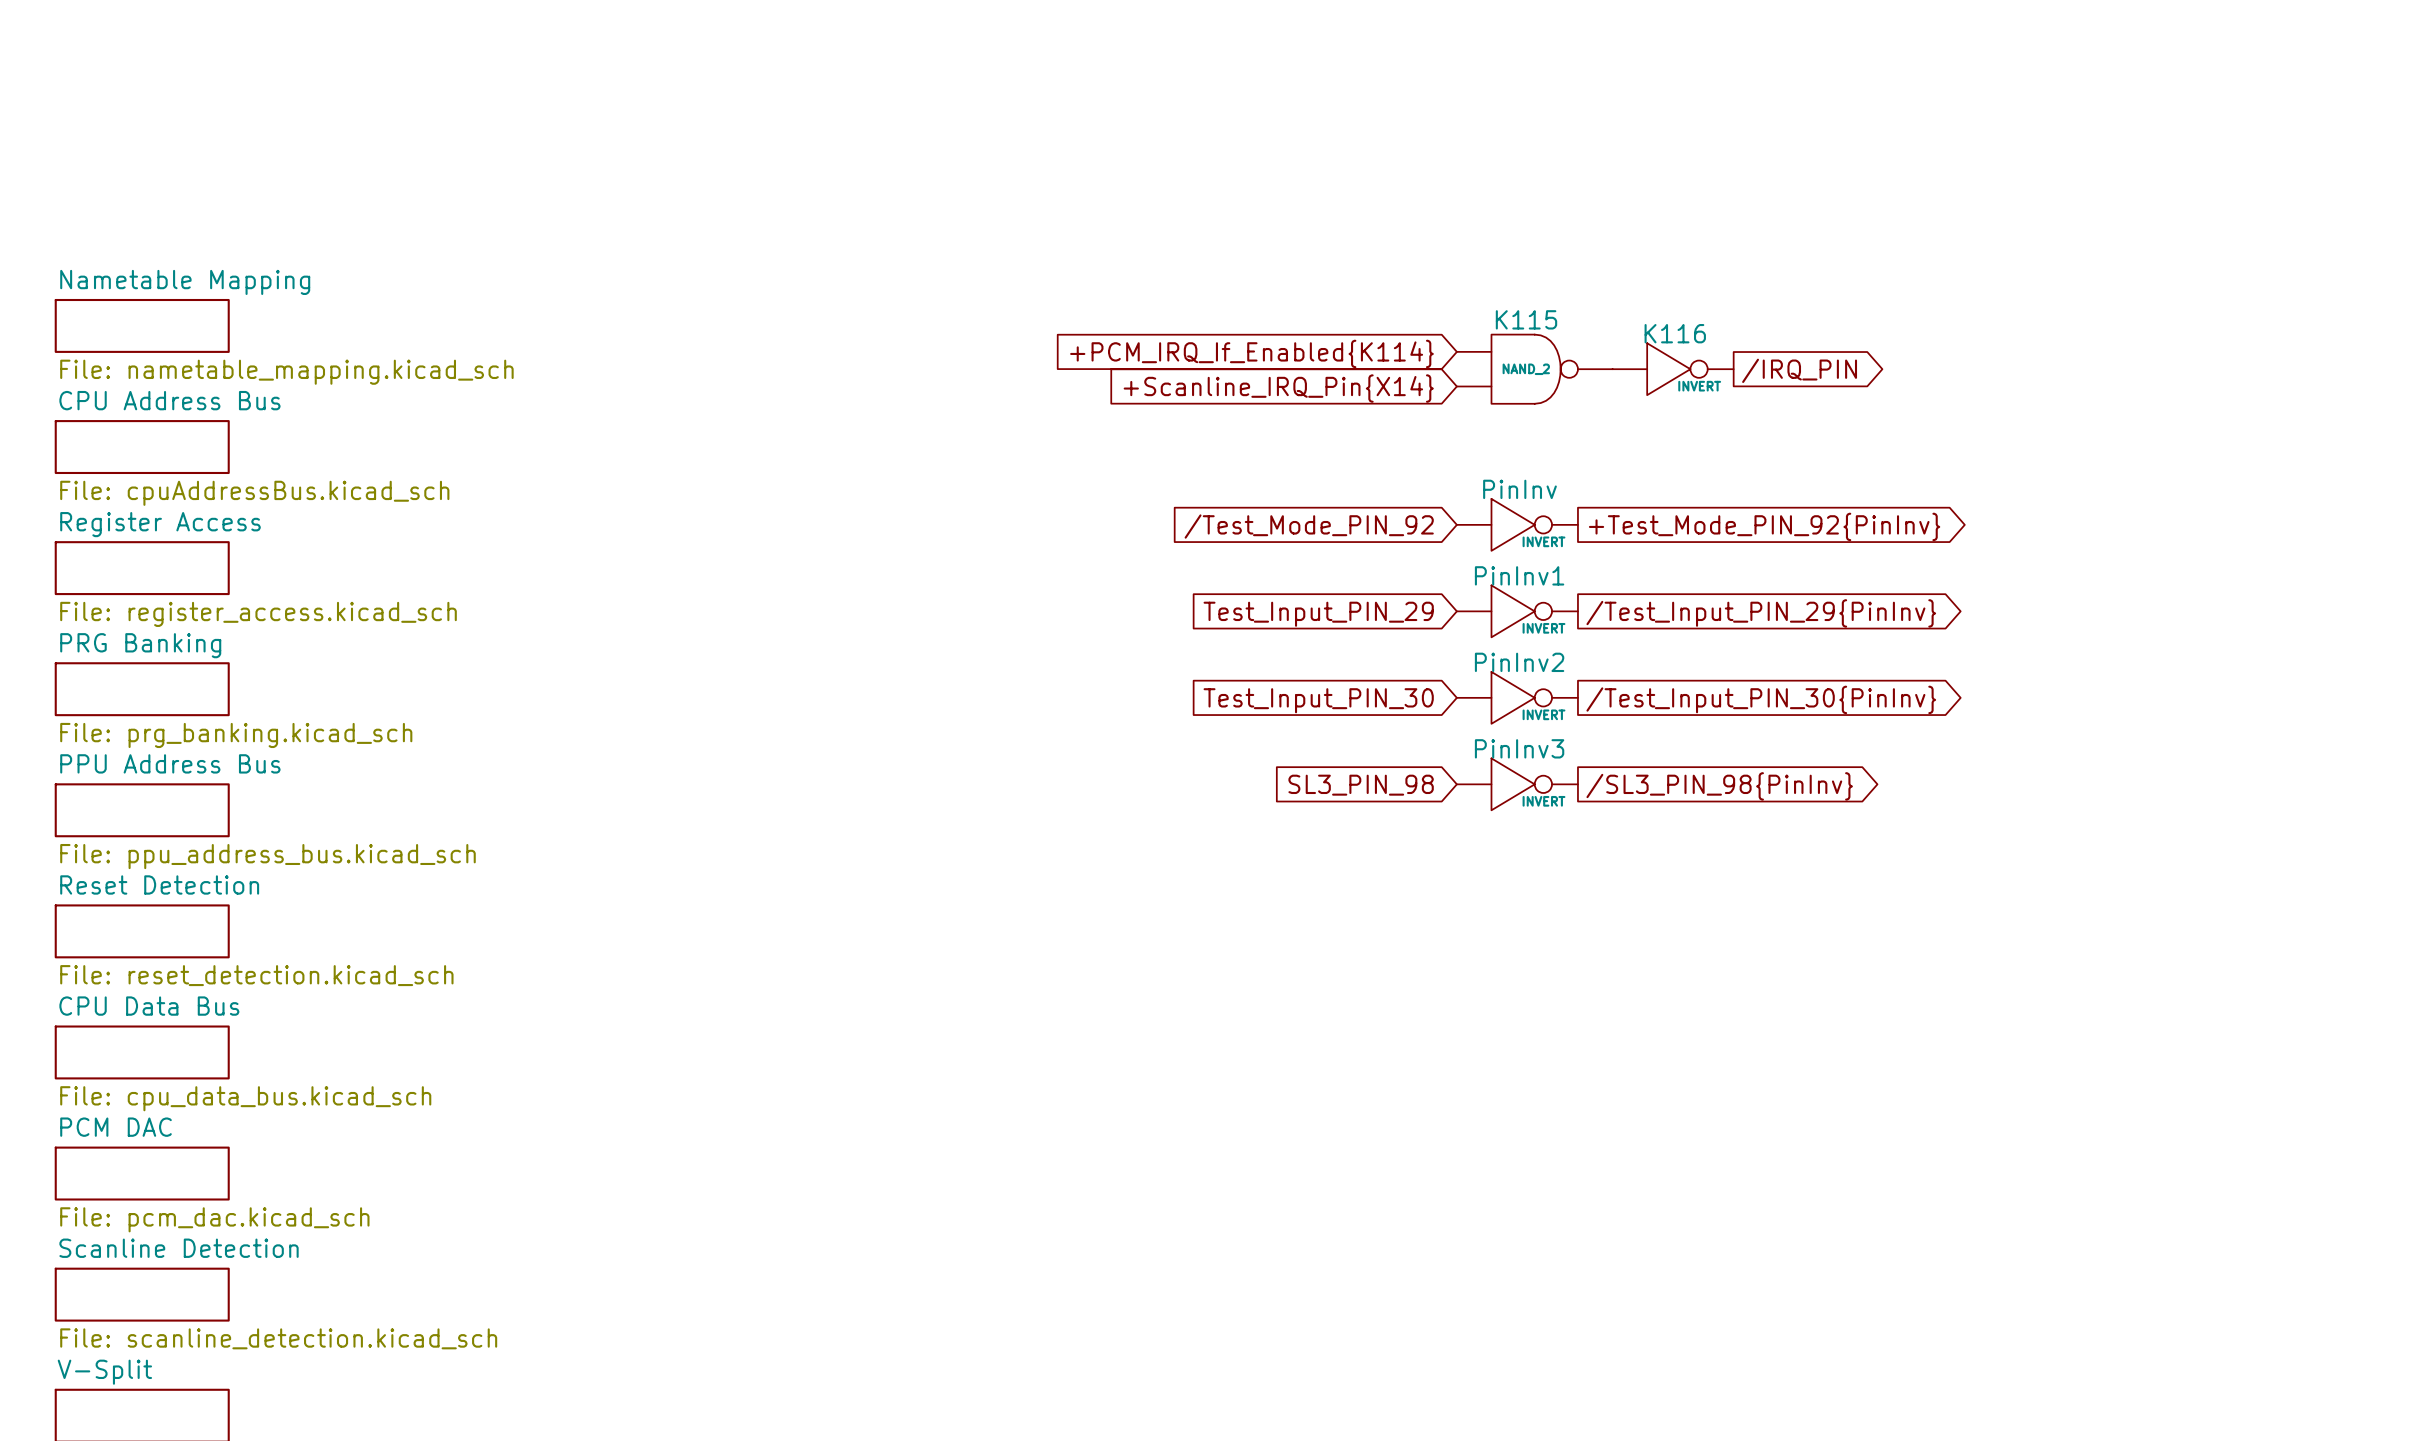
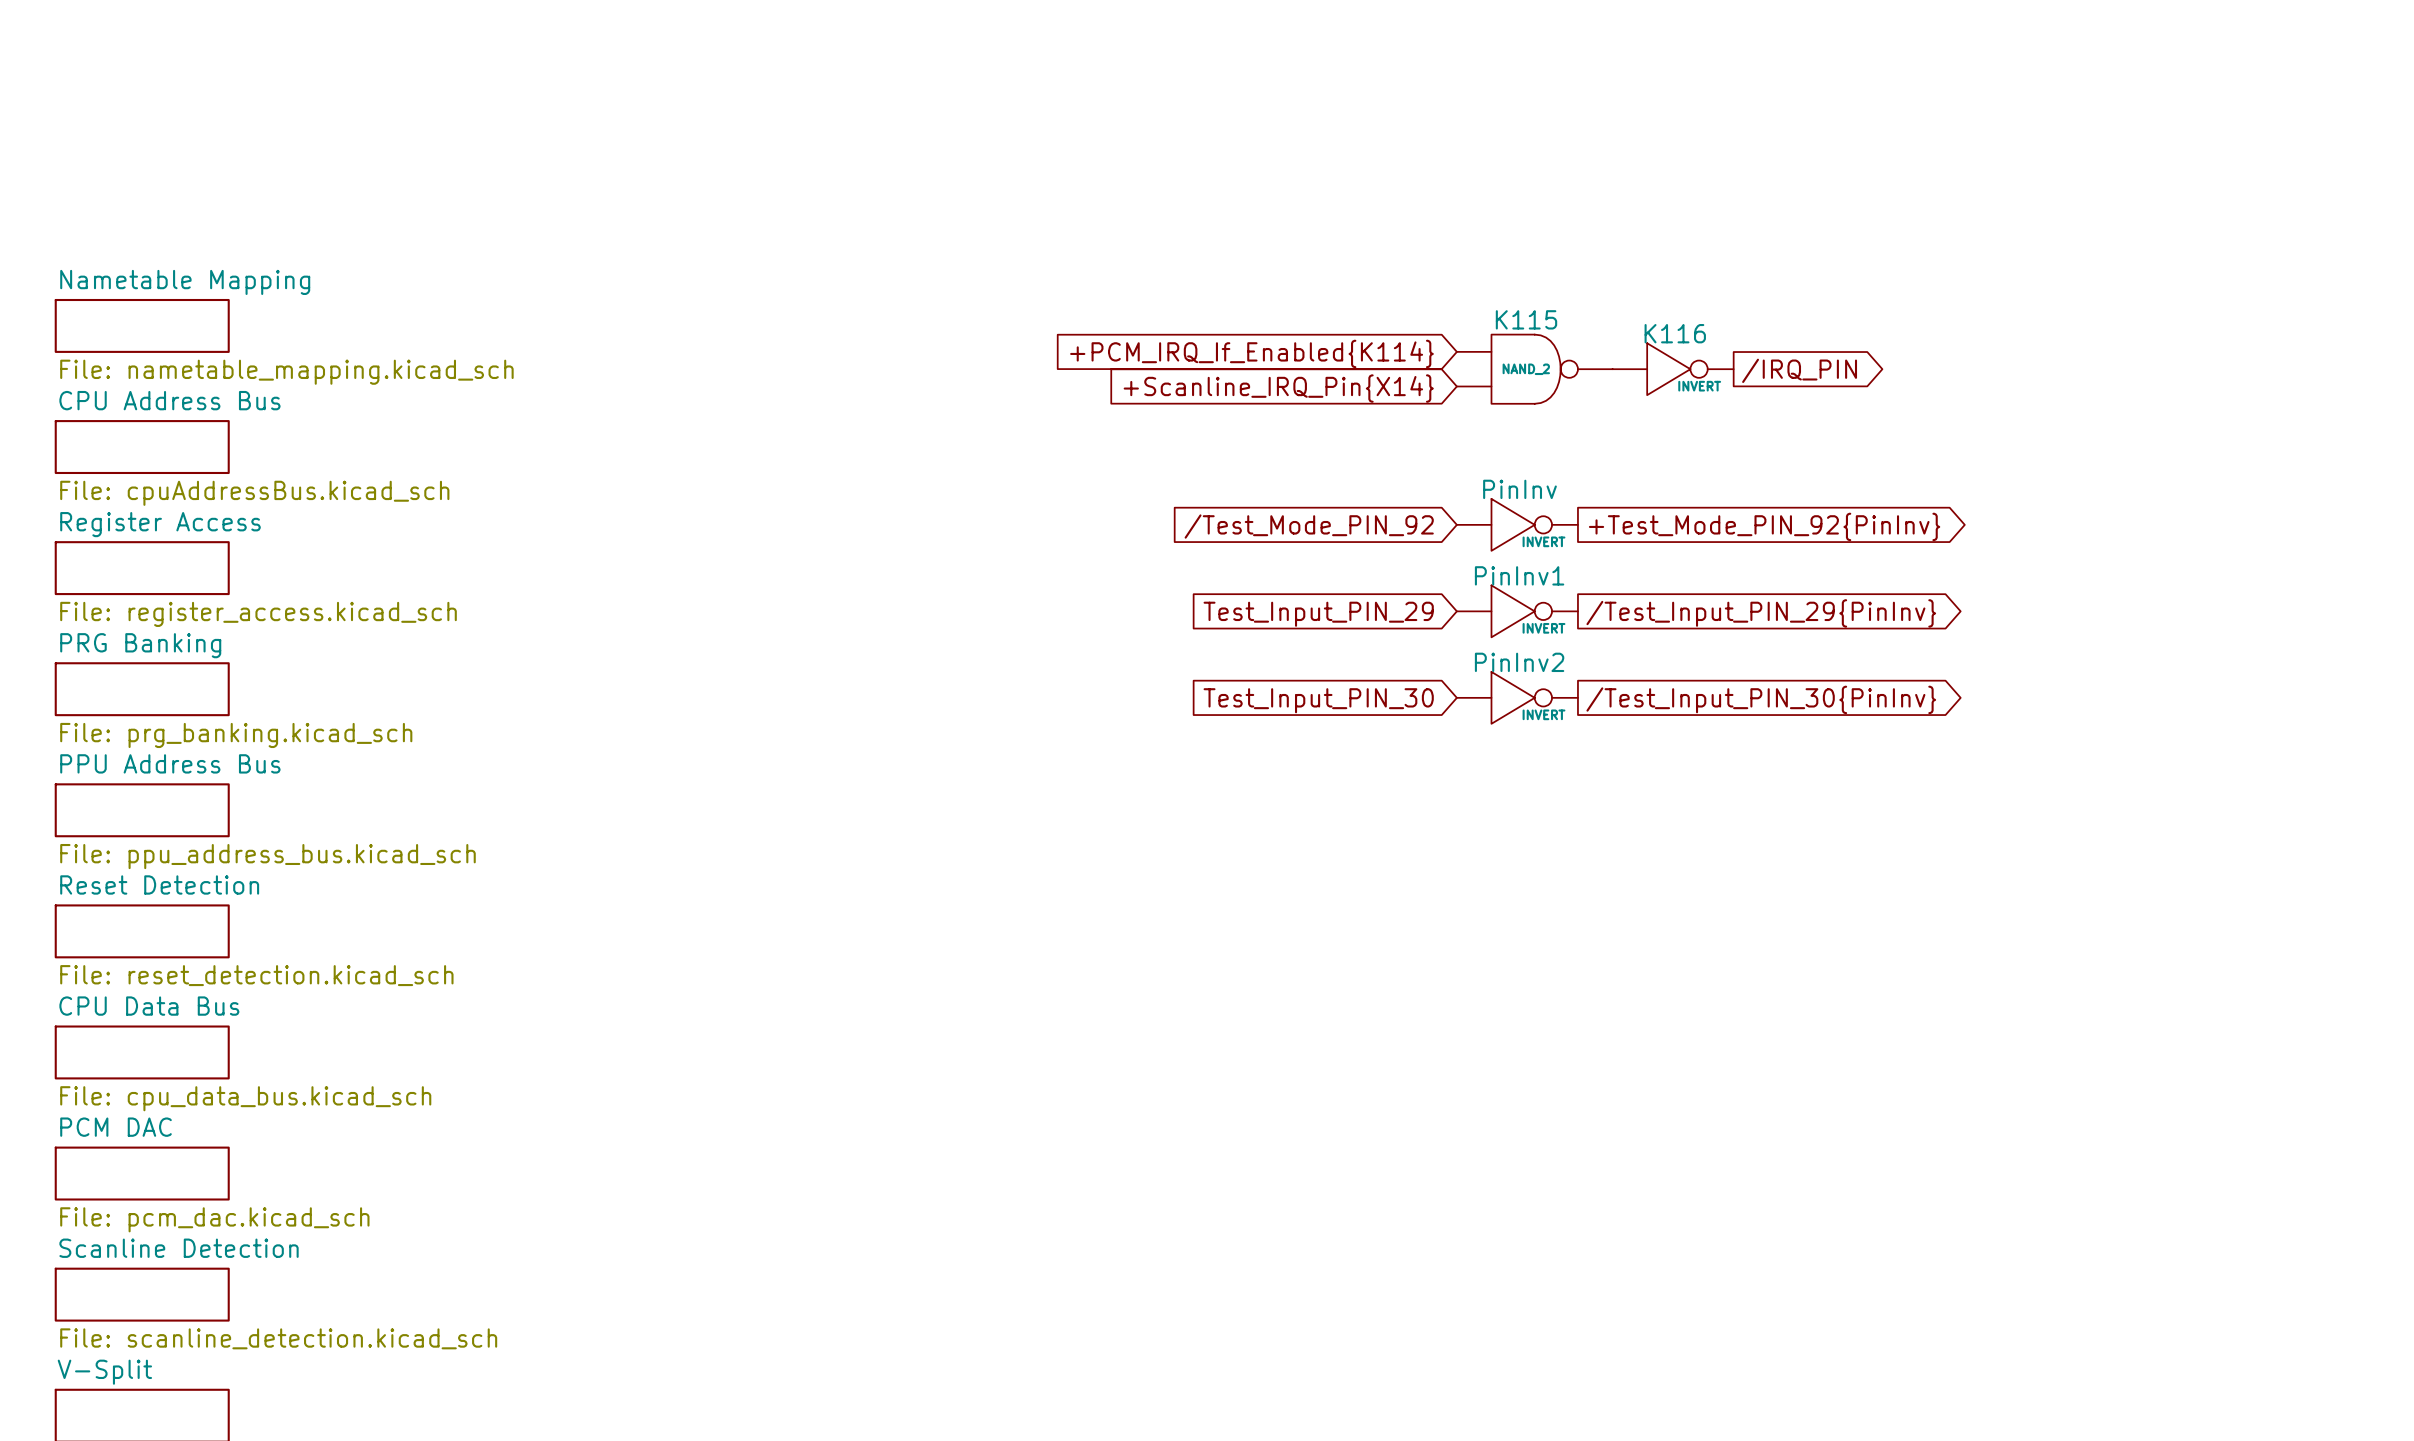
PinInv3: INVERT (1517, 784) -> none
global label: SL3_PIN_98 (1361, 785) -> none
global label: /SL3_PIN_98{PinInv} (1719, 786) -> none

